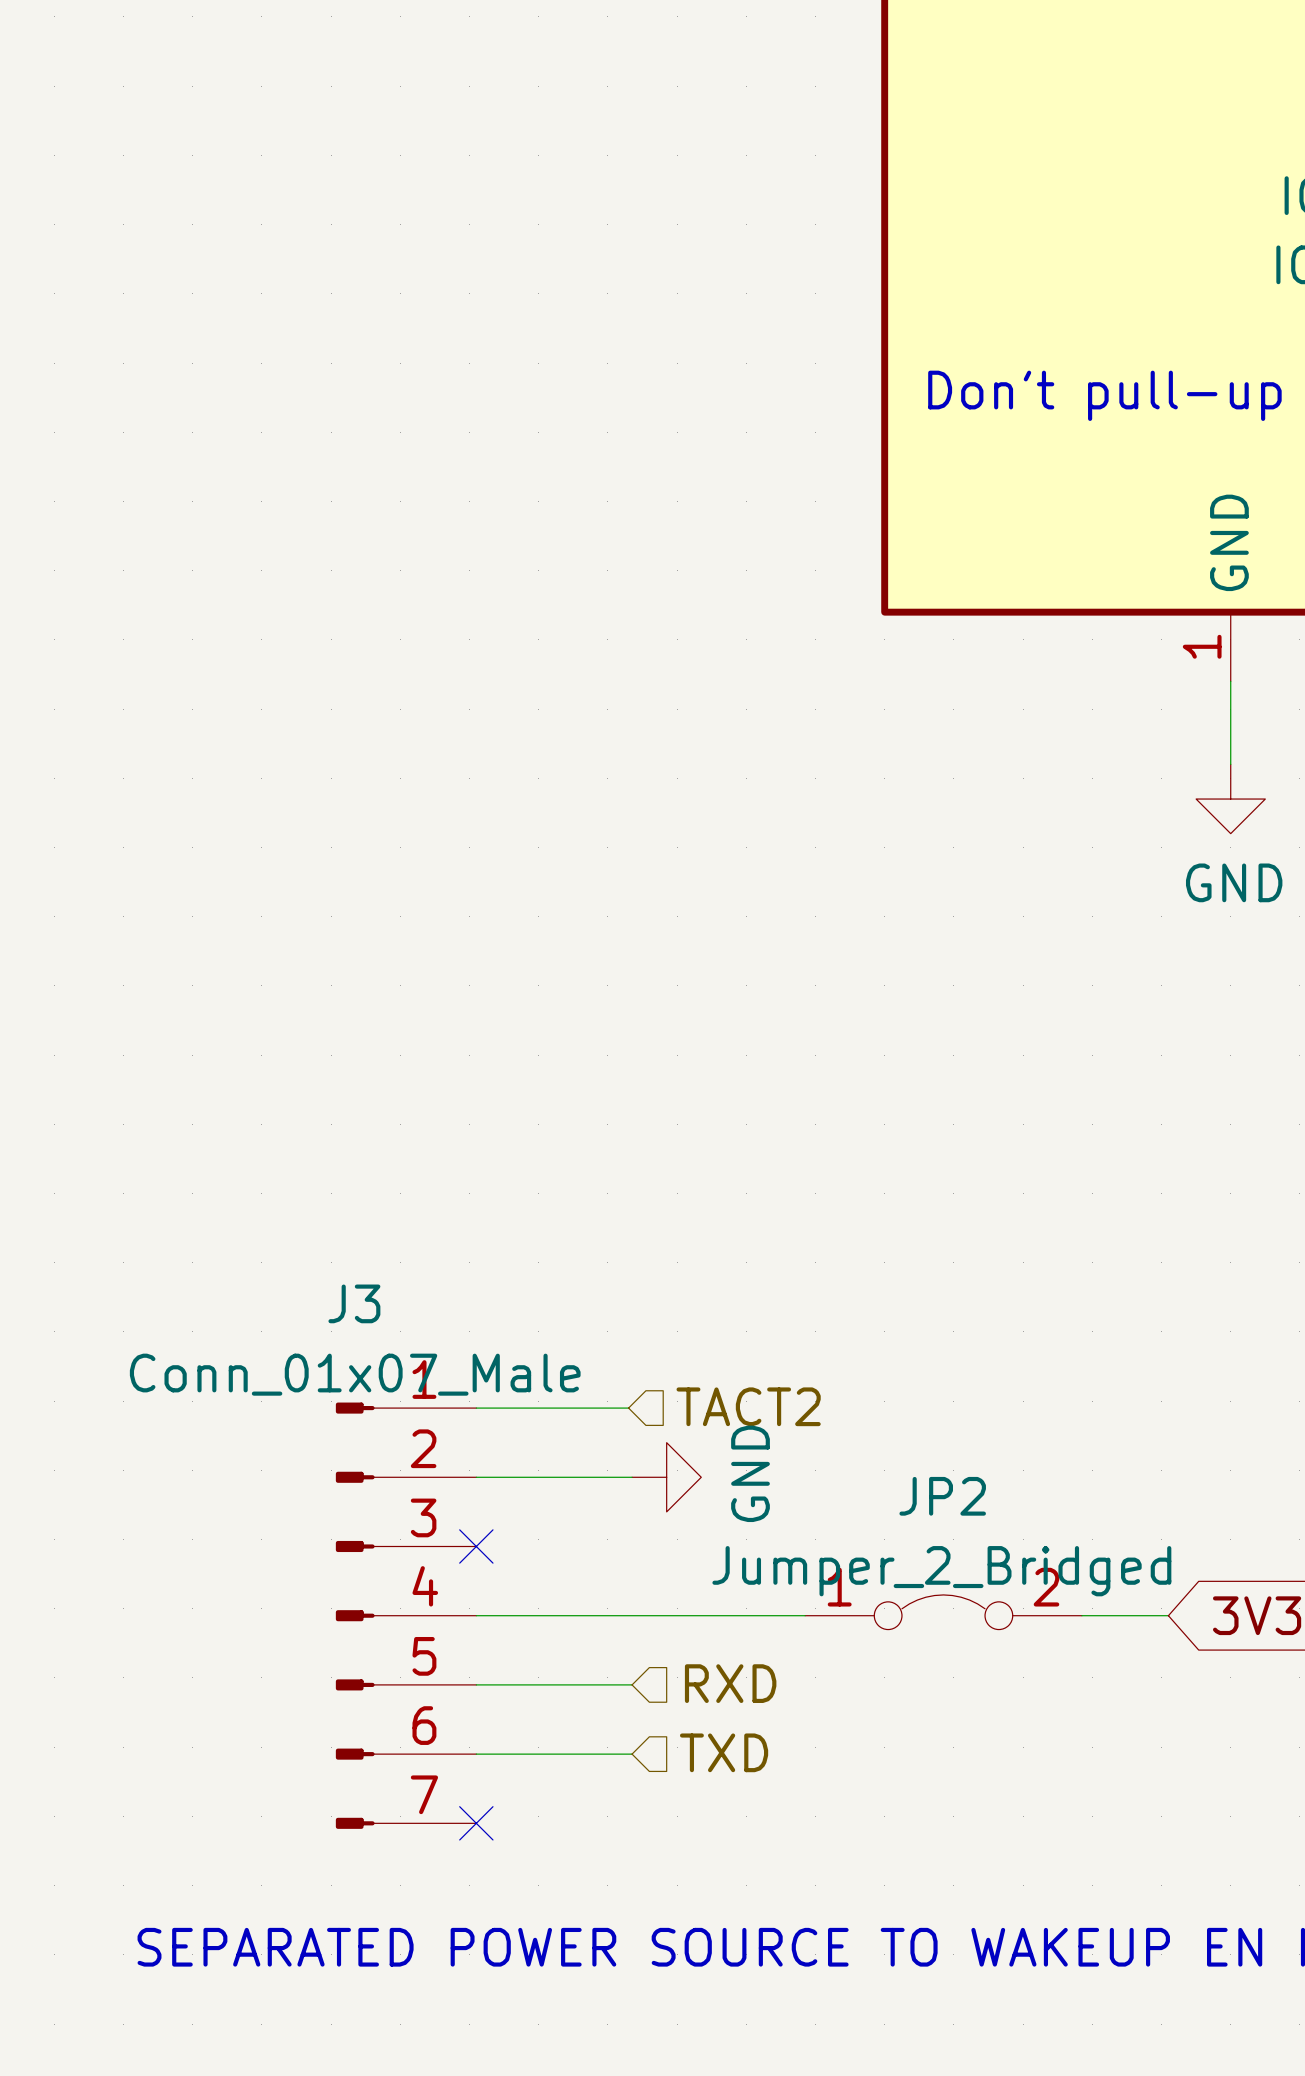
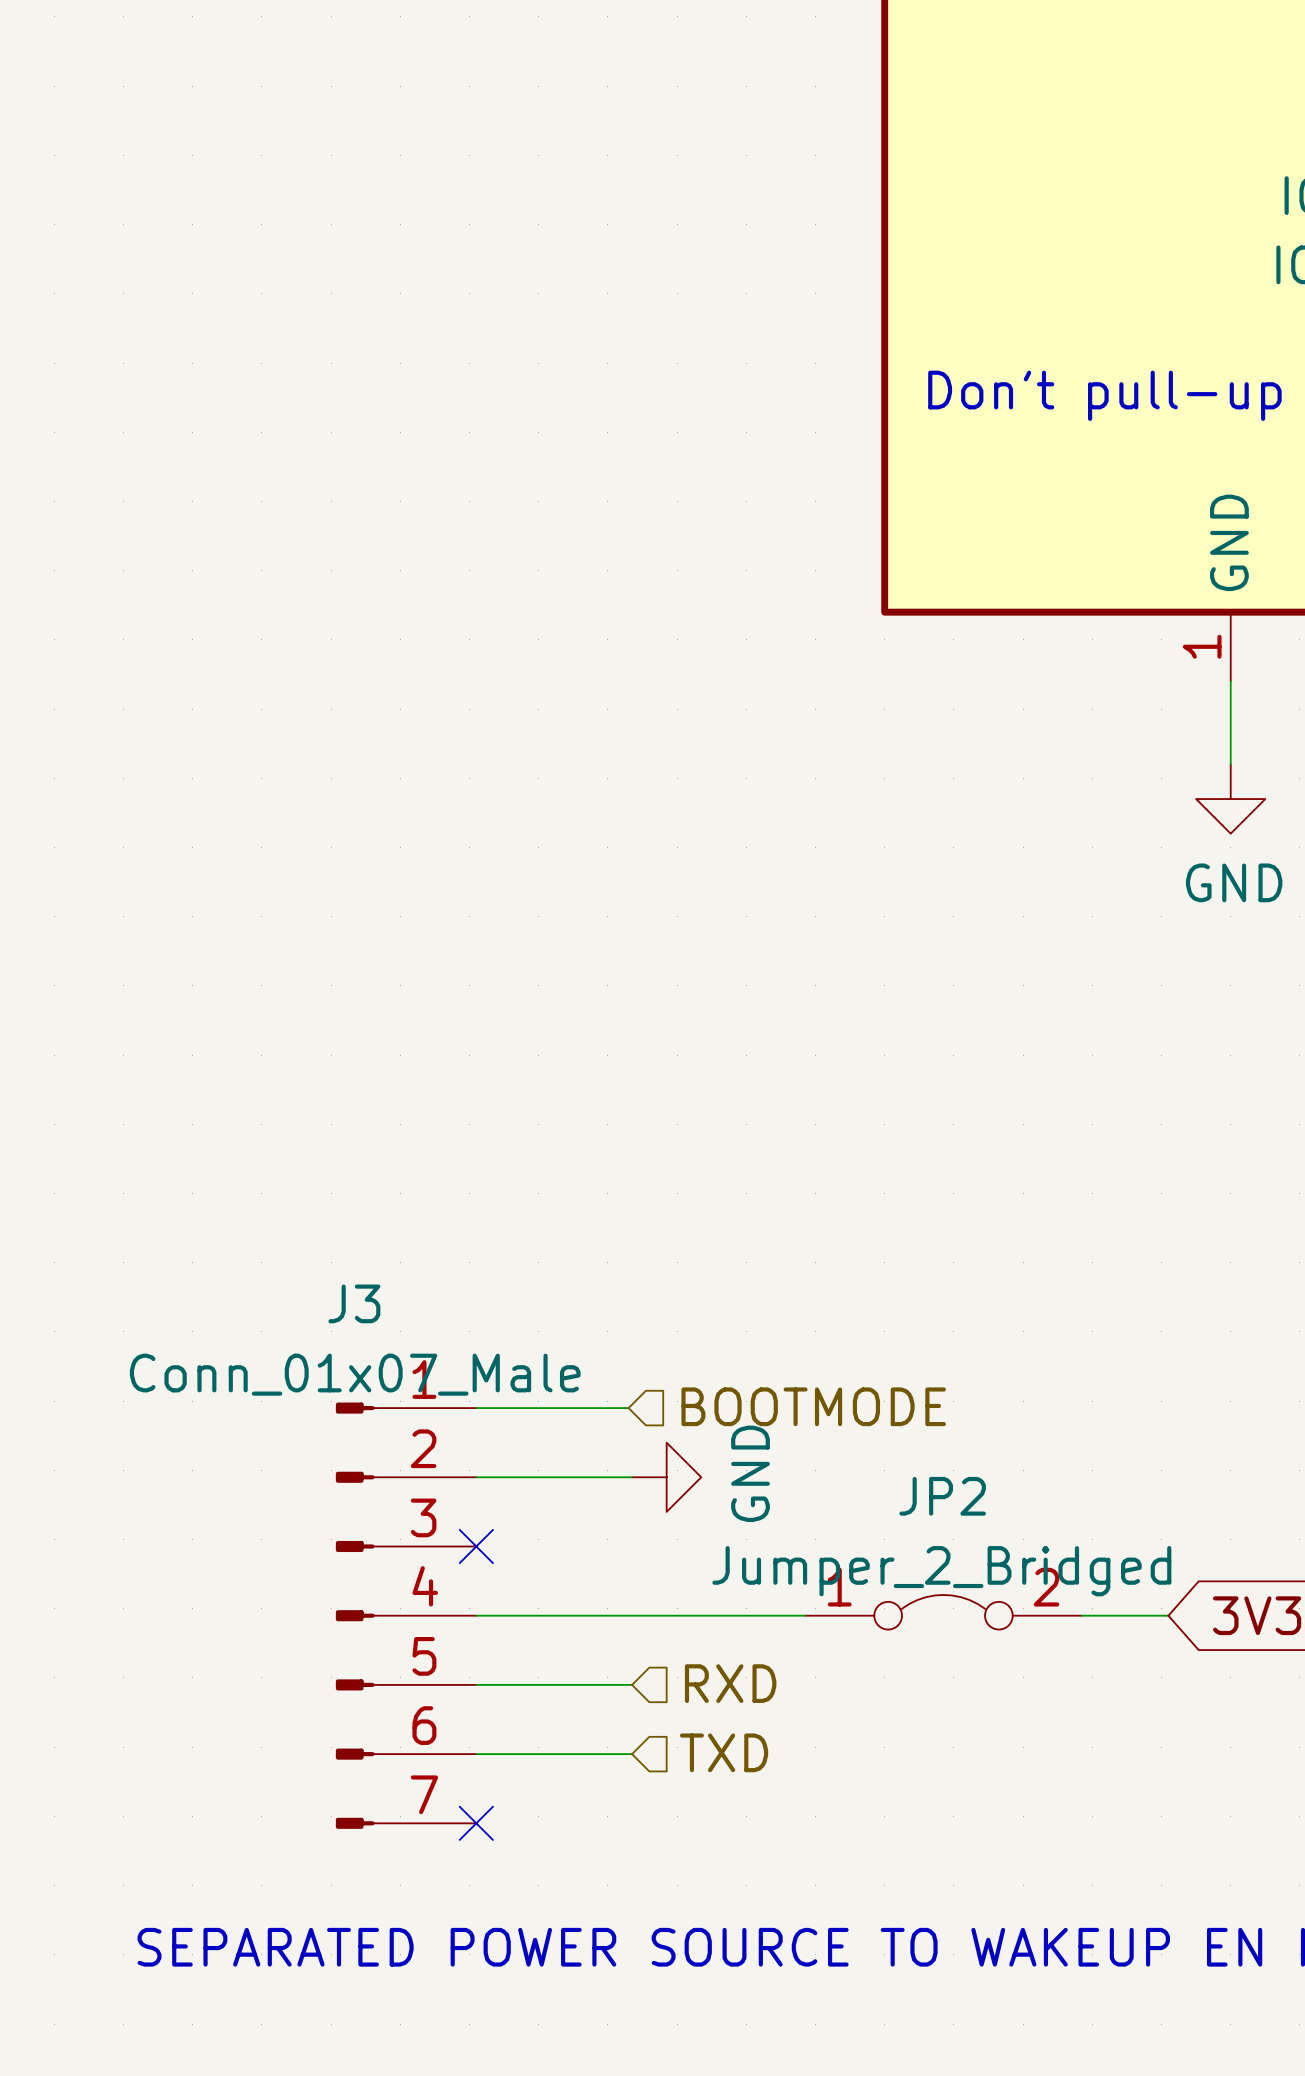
hierarchical label: TACT2 (748, 1406) -> BOOTMODE (813, 1406)

